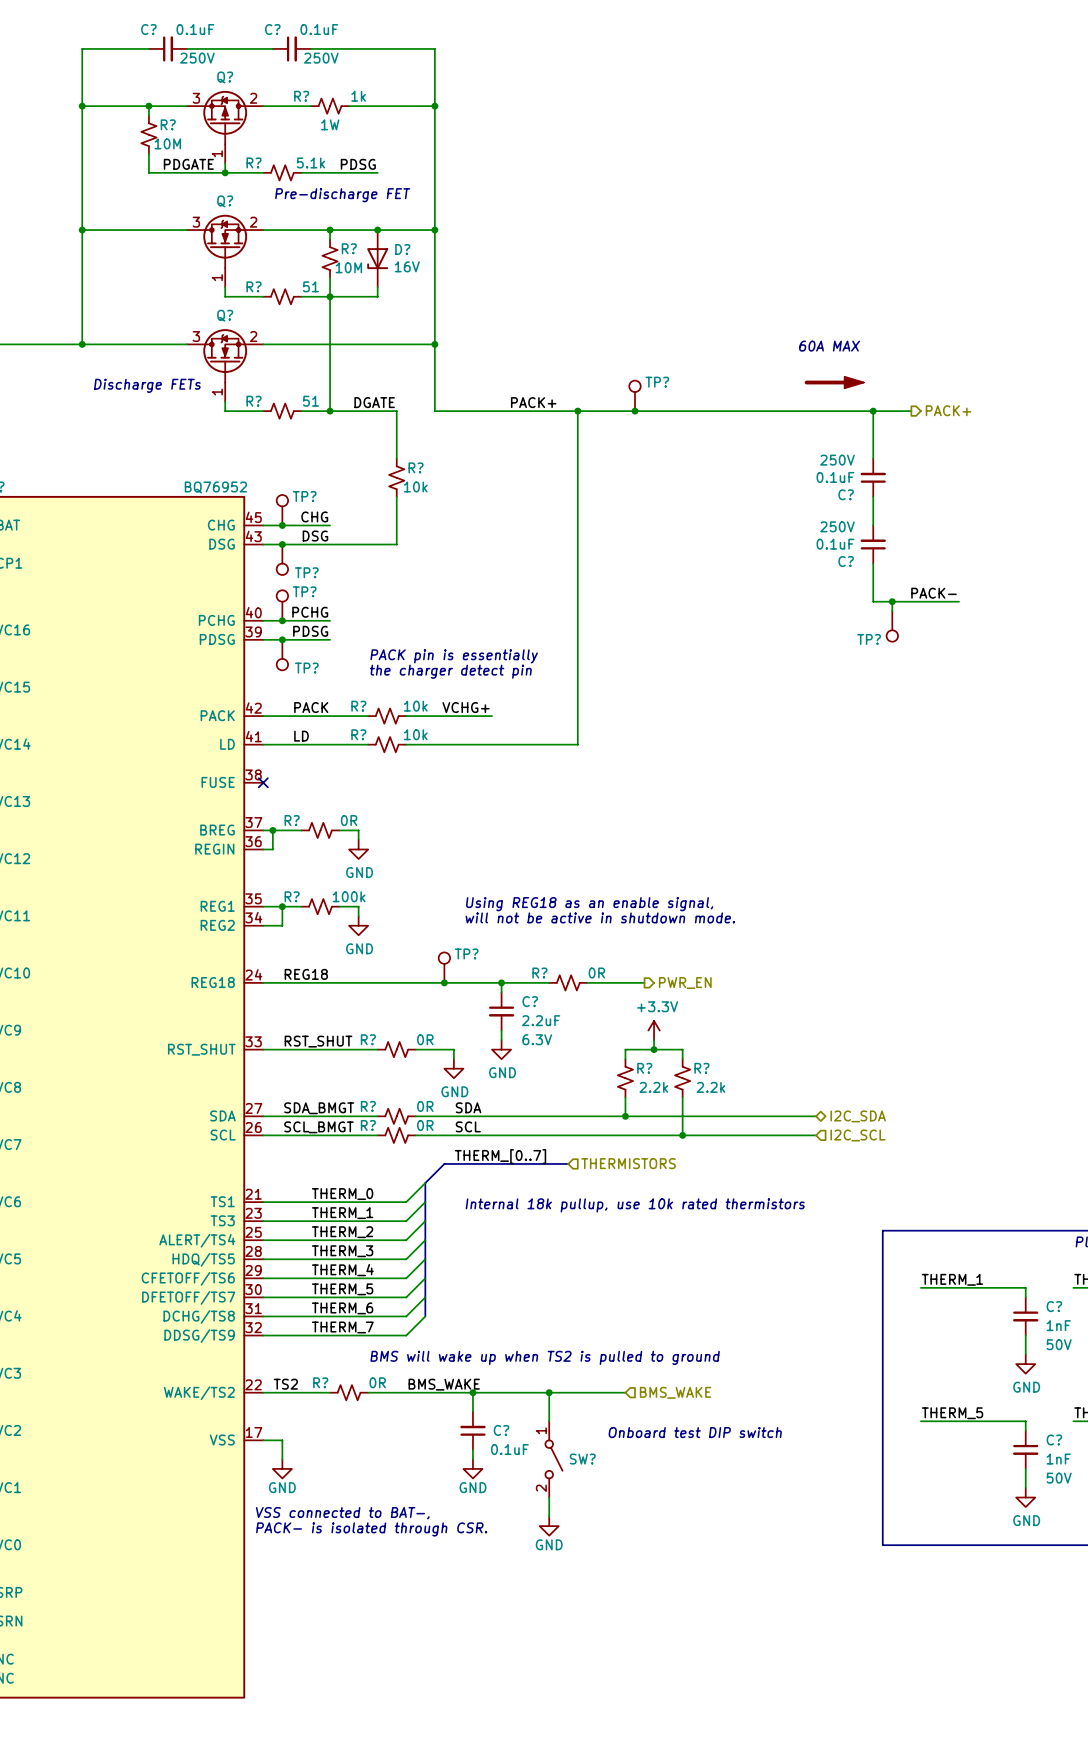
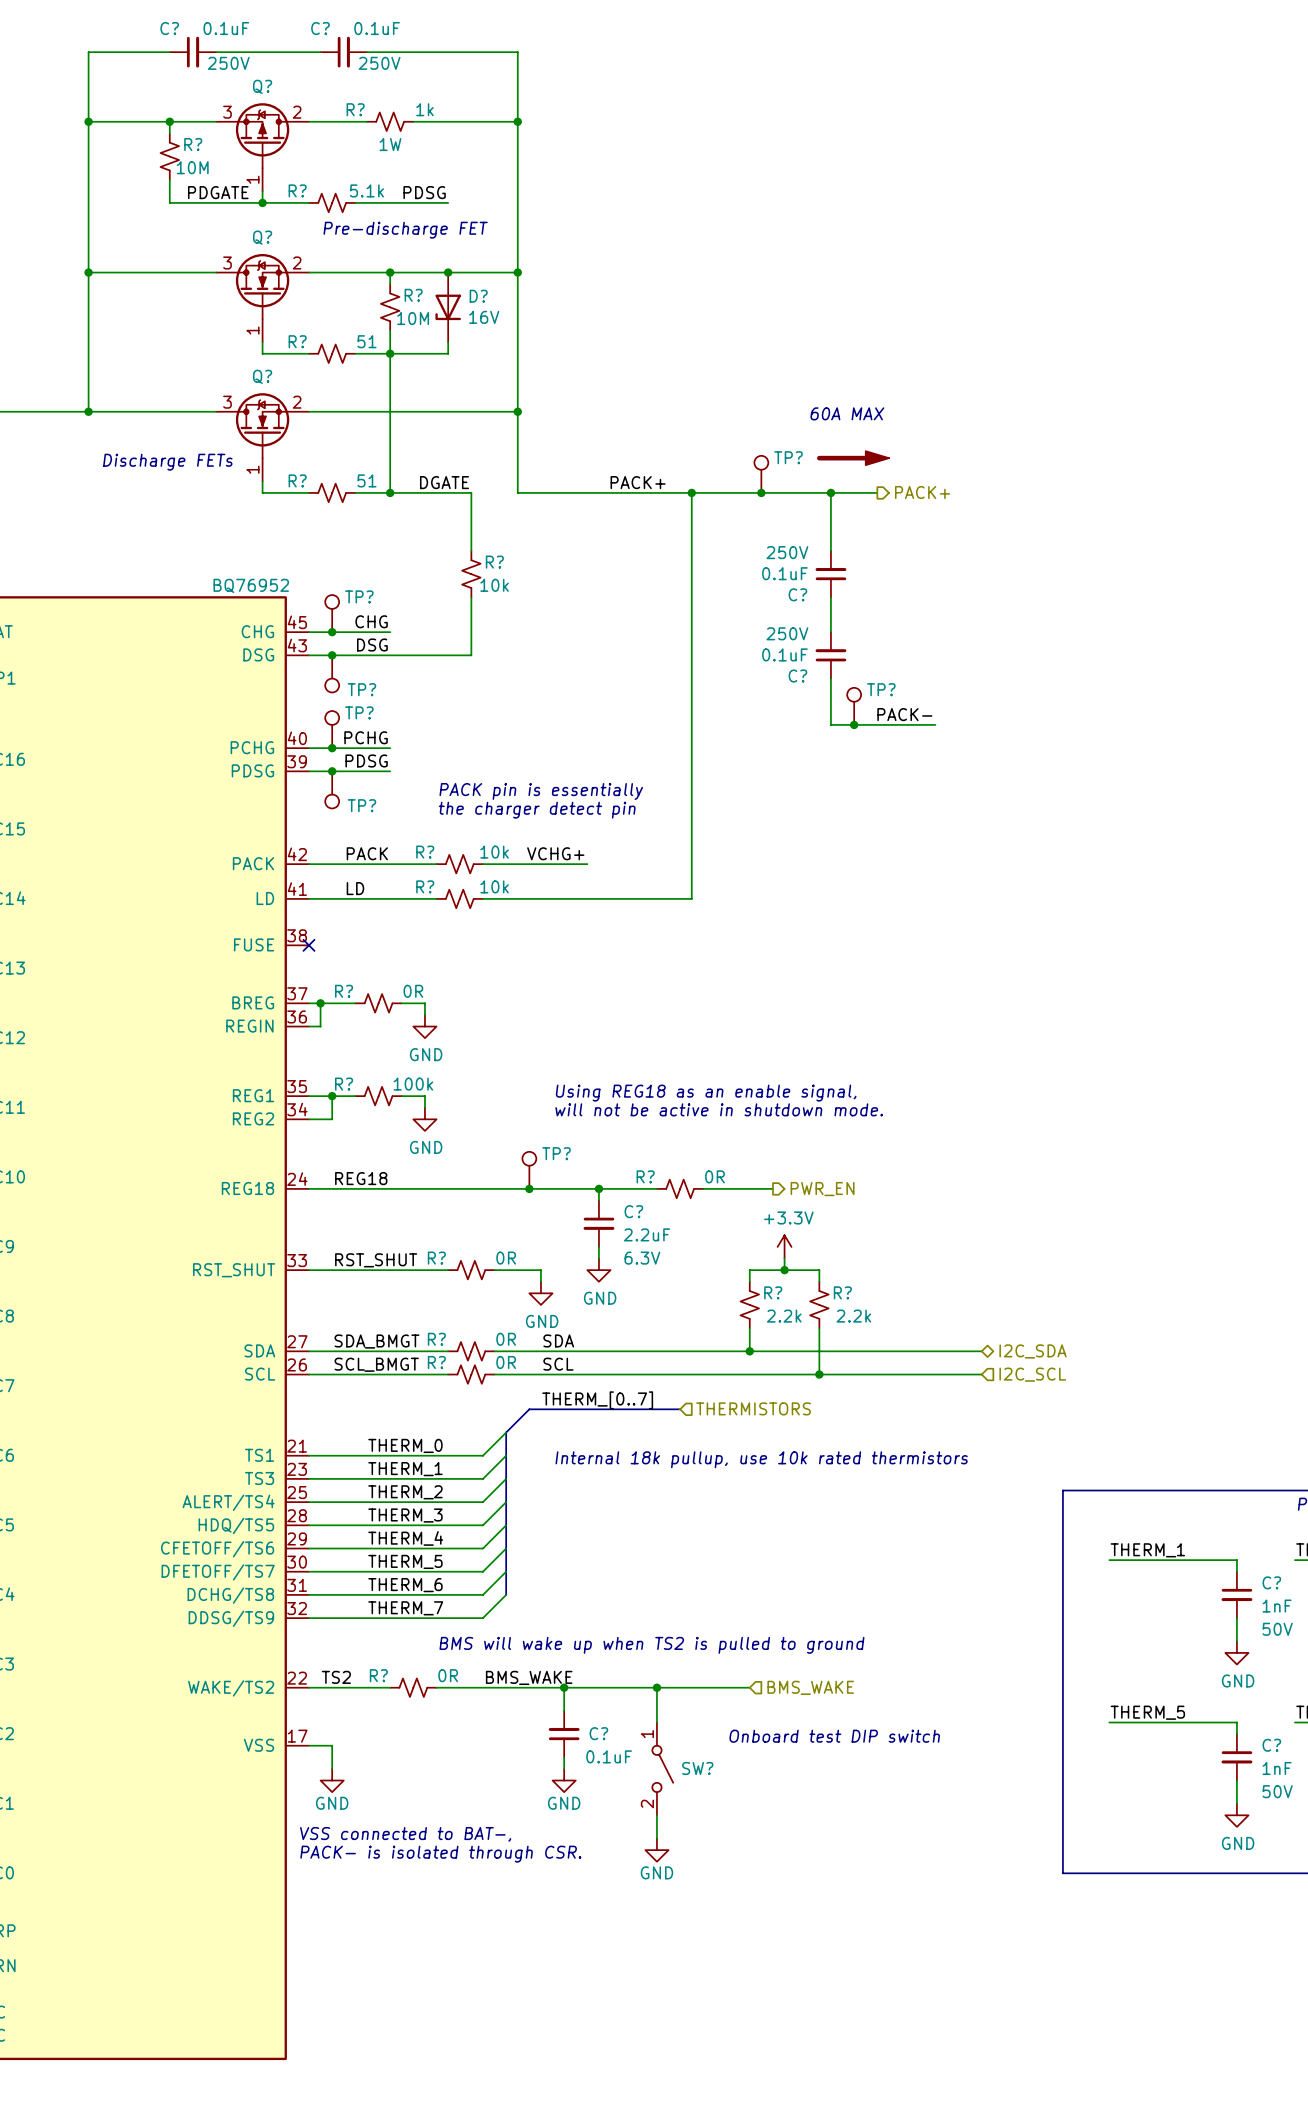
text position: 60A MAX (829, 346) -> 60A MAX (847, 413)
power symbol position: (834, 382) -> (853, 458)
hierarchical label position: PACK+ (948, 410) -> PACK+ (922, 492)
junction: none -> (830, 492)
wire: (730, 411) (911, 411) -> none
wire: (873, 411) (873, 458) -> (830, 492) (830, 550)
junction: (873, 411) -> none
C?: none -> 0.1uF (830, 574)
C?: 0.1uF (873, 477) -> none
wire: (873, 496) (873, 525) -> (830, 597) (830, 632)
C?: none -> 0.1uF (830, 655)
C?: 0.1uF (873, 544) -> none
wire: (873, 563) (873, 601) (959, 601) -> (830, 678) (830, 724) (935, 724)
label position: PACK- (933, 593) -> PACK- (904, 714)
junction: none -> (854, 724)
wire: (892, 601) (892, 611) -> none
junction: (892, 601) -> none
TP? position: (892, 626) -> (854, 706)
TP? rotation: 0° (892, 636) -> 180° (854, 694)

